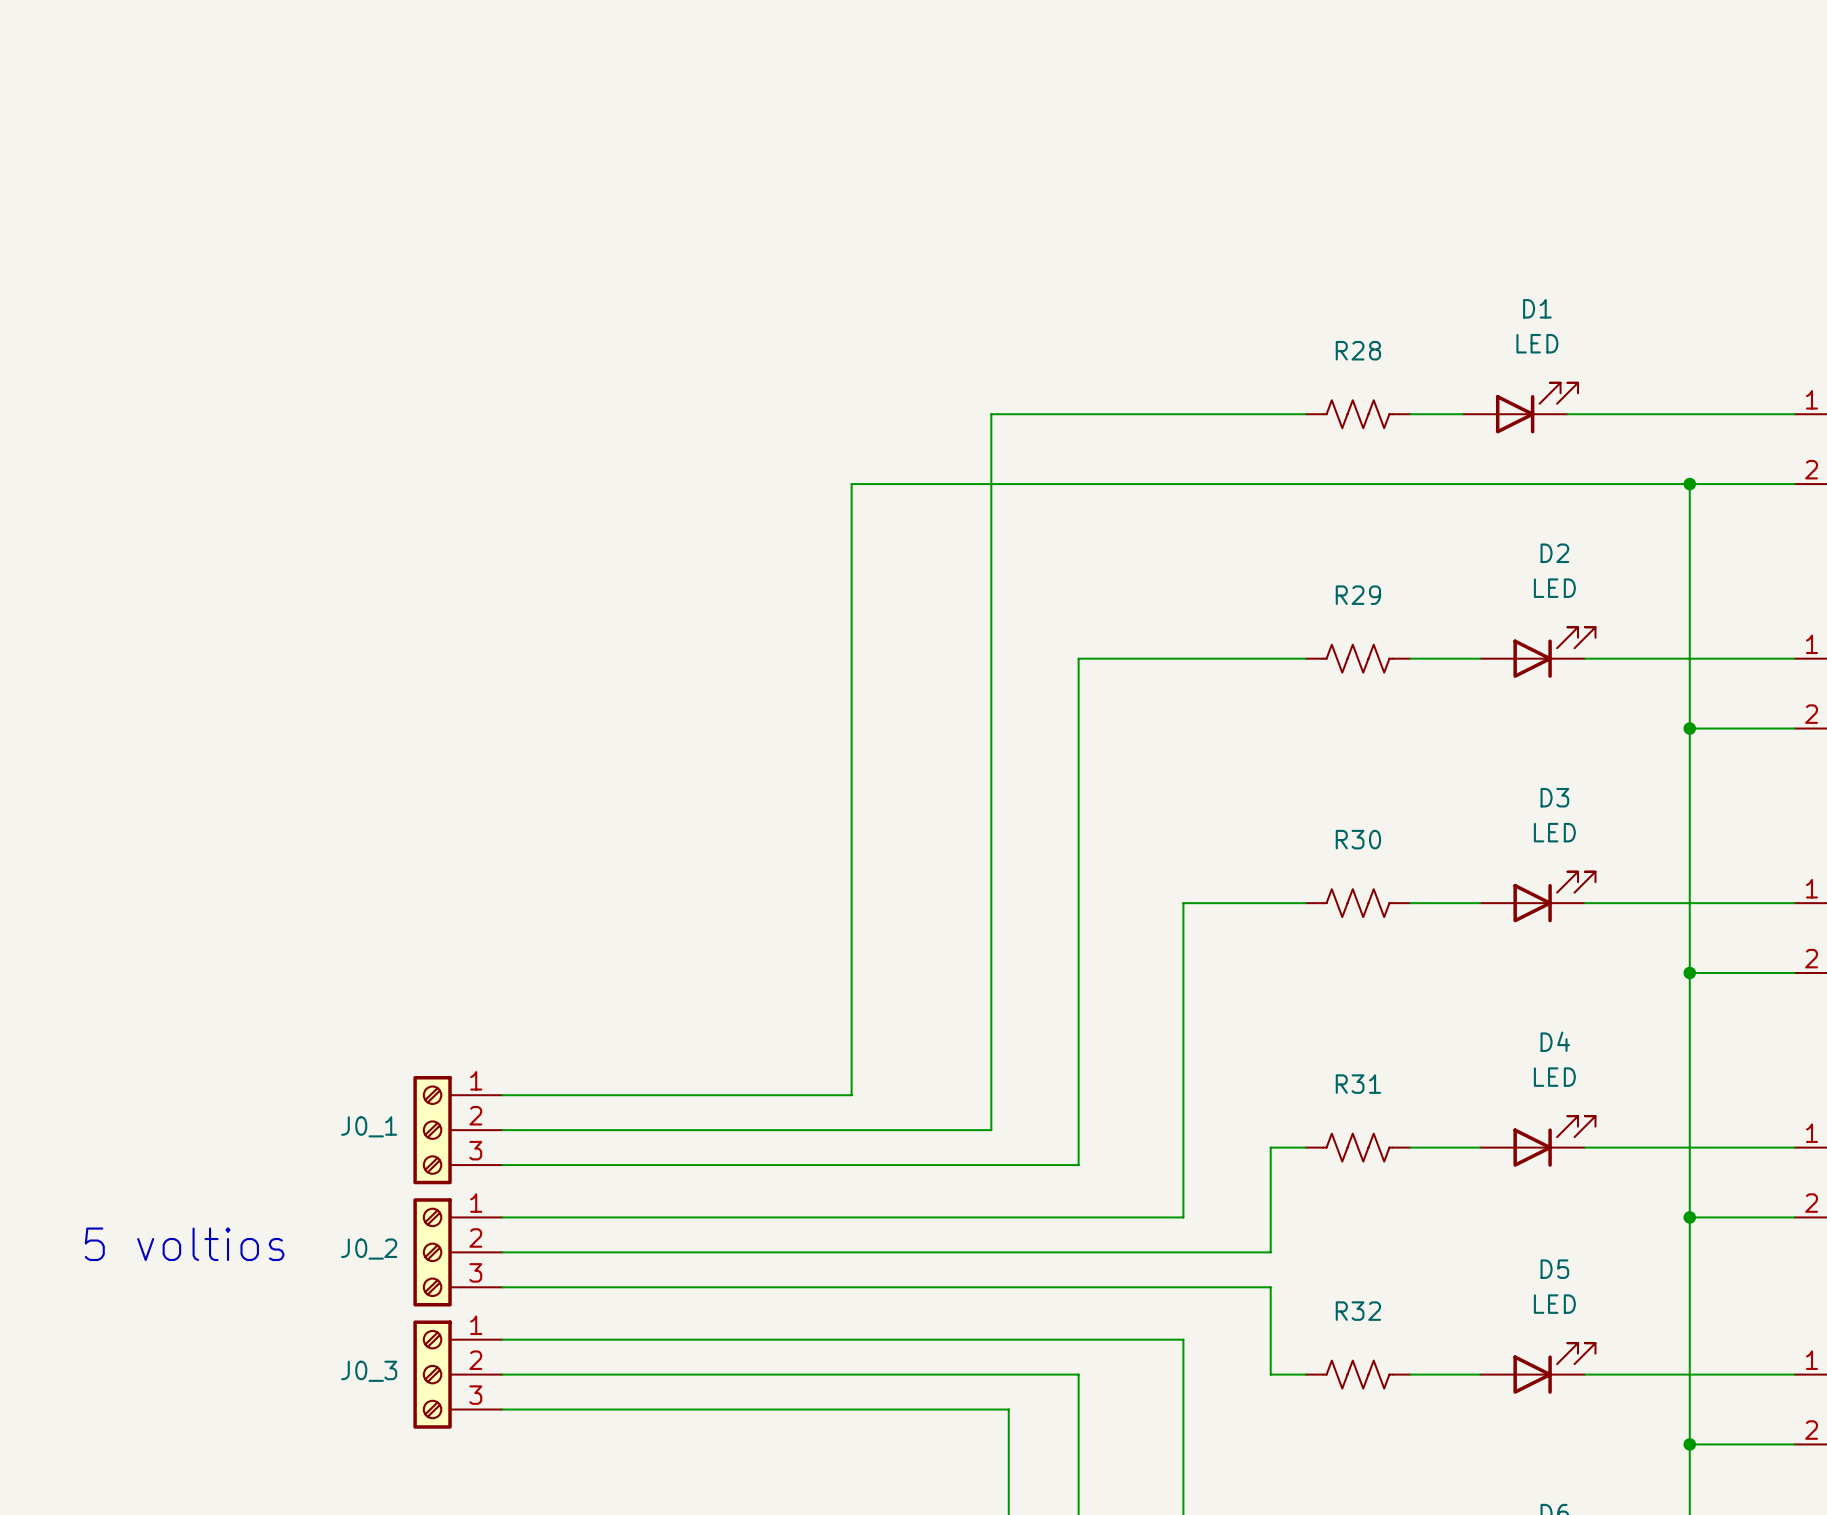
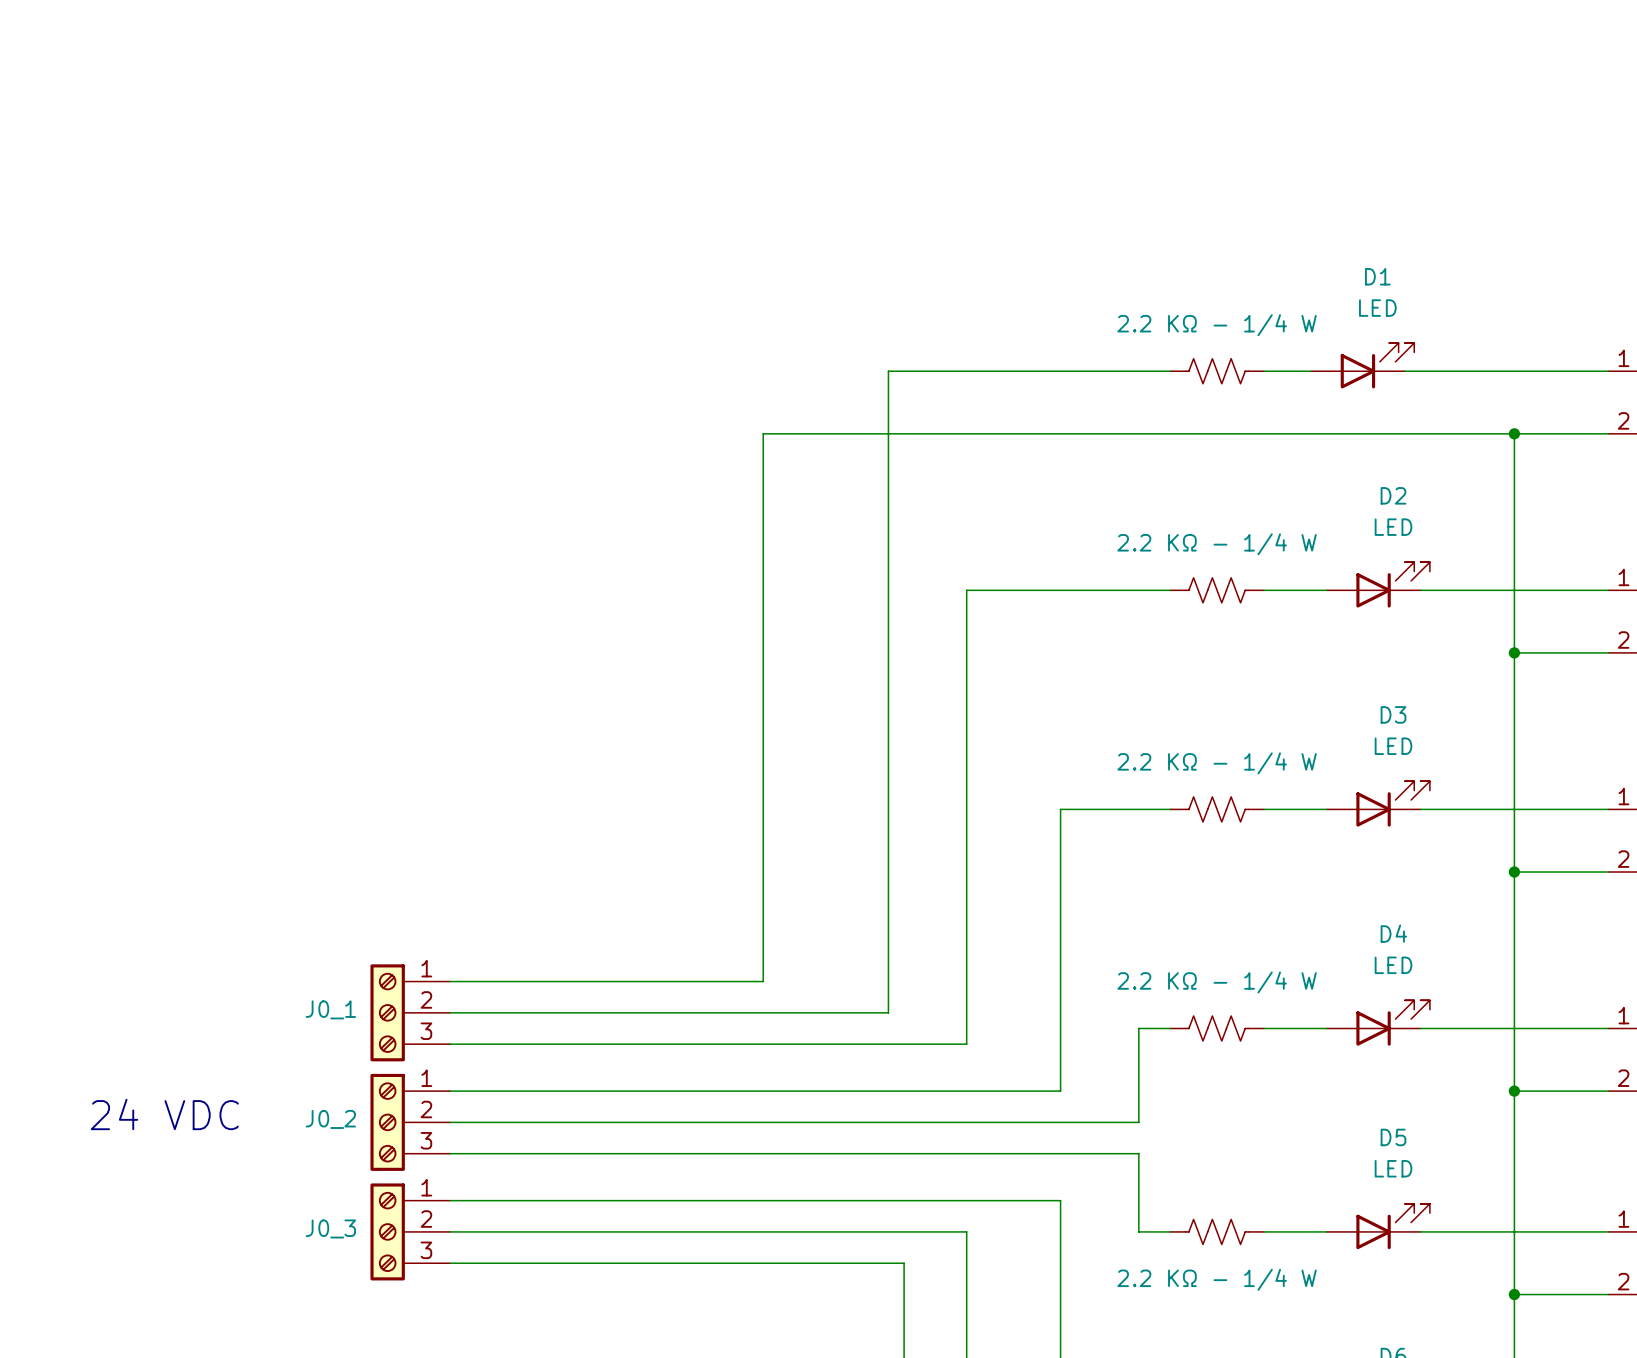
R28 name: R28 (1358, 350) -> none
R28 value: none -> 2.2 KΩ - 1/4 W (1217, 325)
R29 name: R29 (1358, 595) -> none
R29 value: none -> 2.2 KΩ - 1/4 W (1217, 544)
R30 name: R30 (1358, 839) -> none
R30 value: none -> 2.2 KΩ - 1/4 W (1217, 763)
R31 name: R31 (1358, 1084) -> none
R31 value: none -> 2.2 KΩ - 1/4 W (1217, 982)
text: 5 voltios (184, 1244) -> 24 VDC (164, 1114)
R32 name: R32 (1358, 1311) -> none
R32 value: none -> 2.2 KΩ - 1/4 W (1217, 1279)

